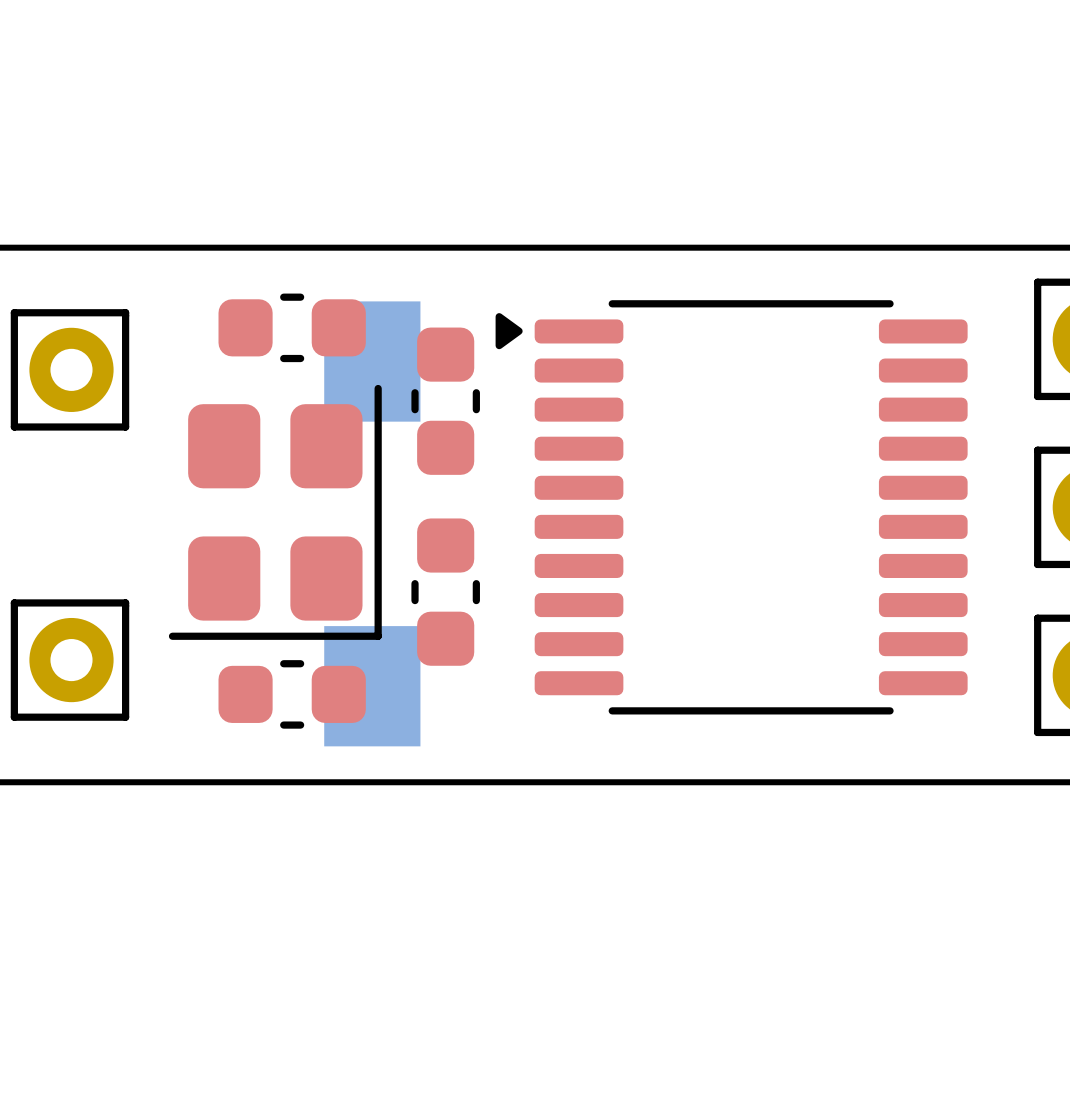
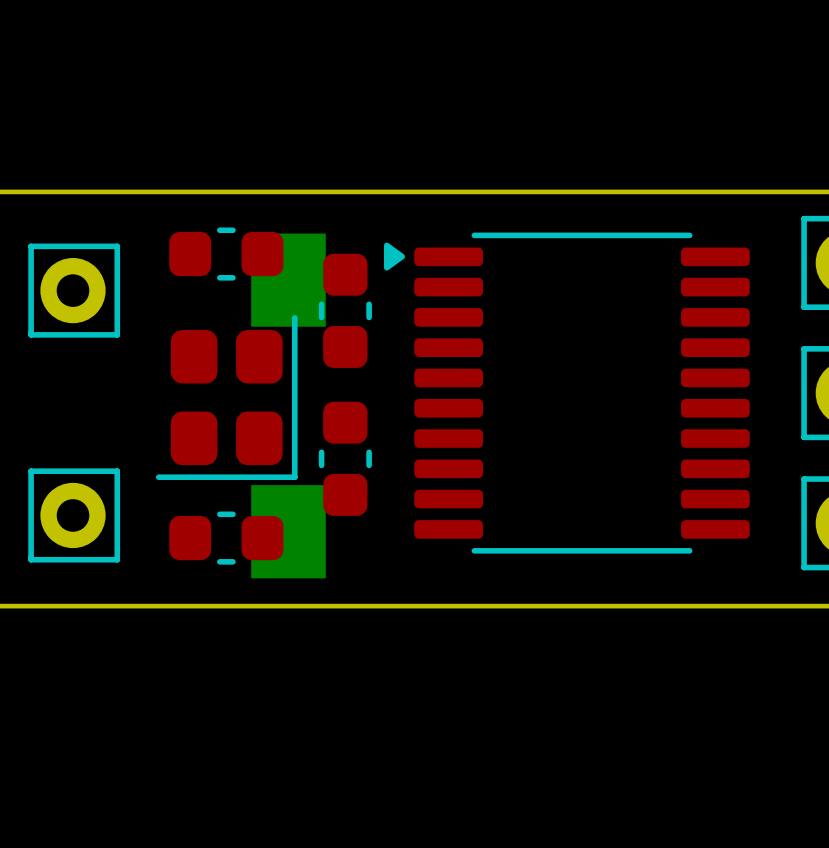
part rotation: 0° (69, 369) -> 180° (74, 290)
part footprint: [168, 384, 382, 640] -> [155, 315, 298, 481]
part rotation: 0° (69, 660) -> 180° (74, 515)

